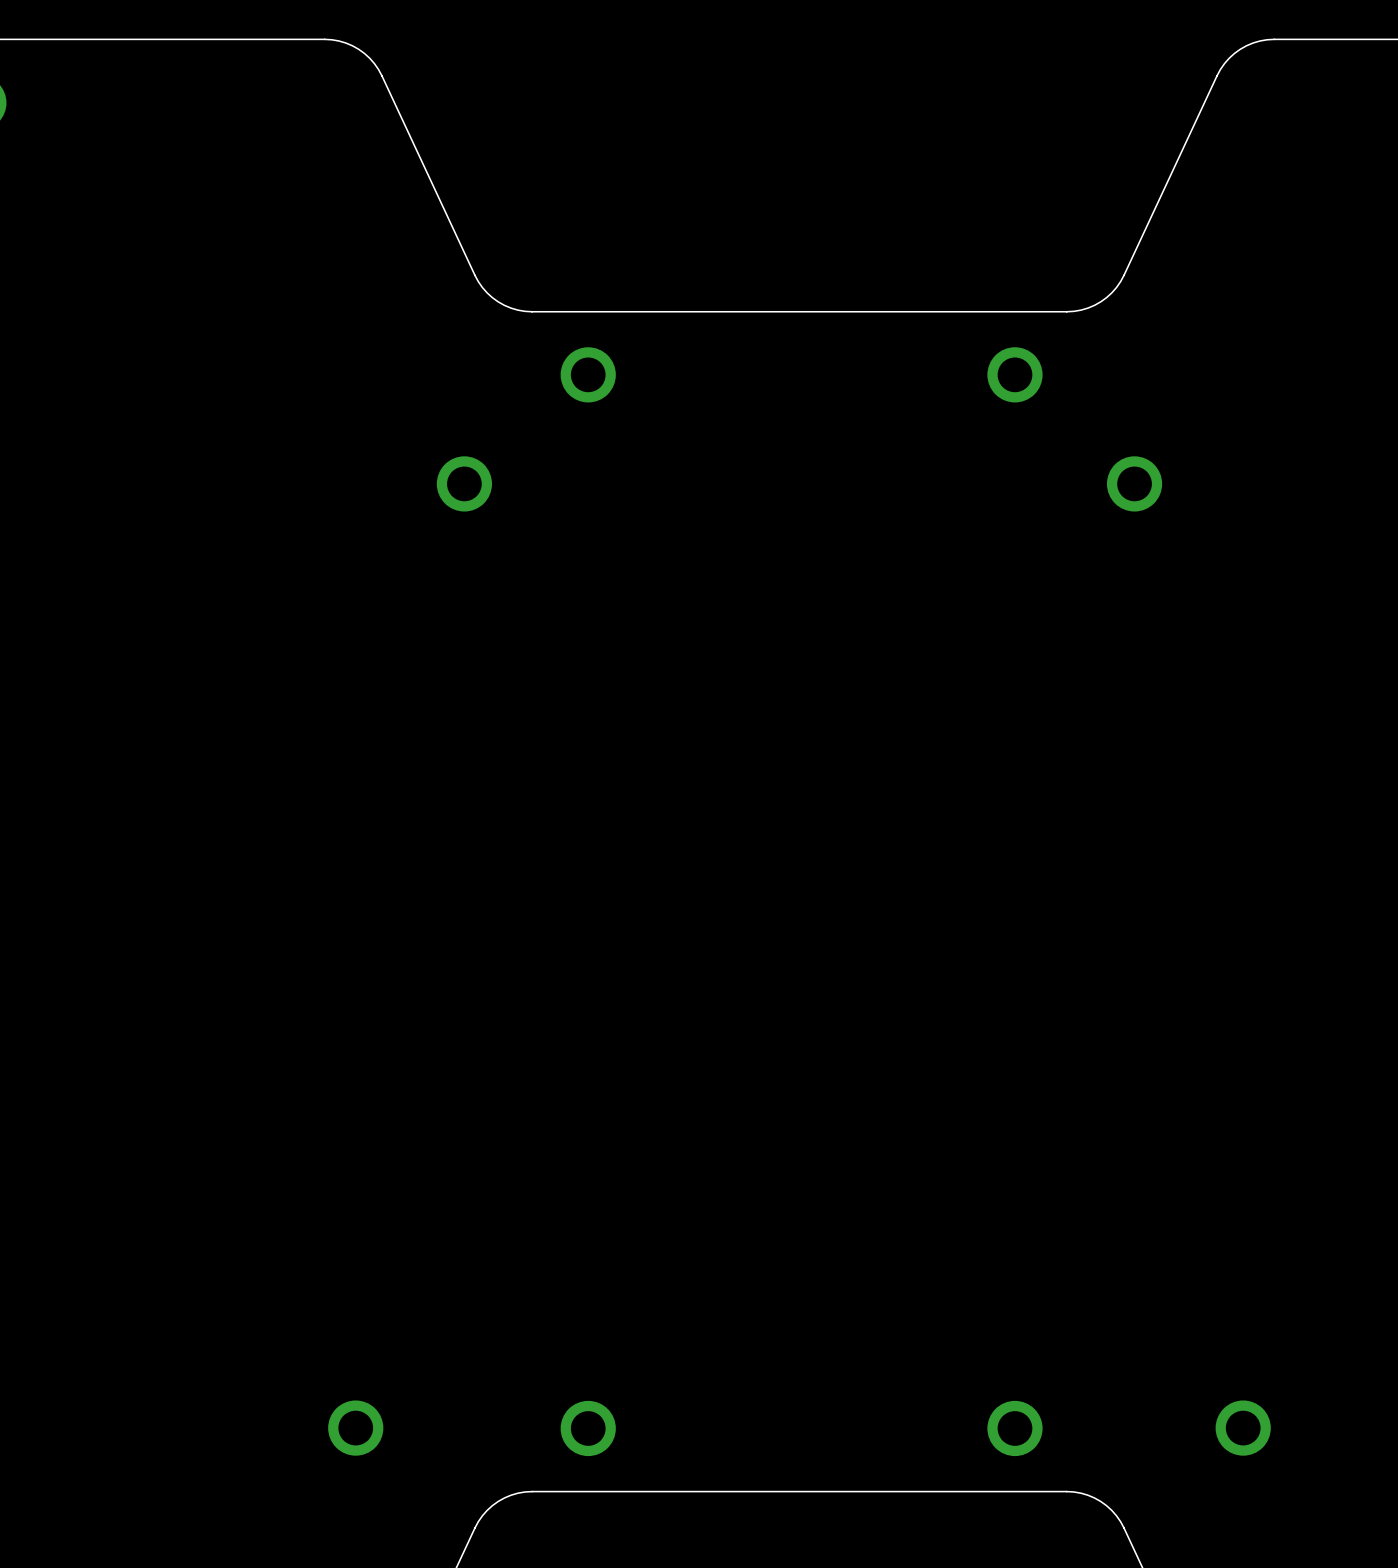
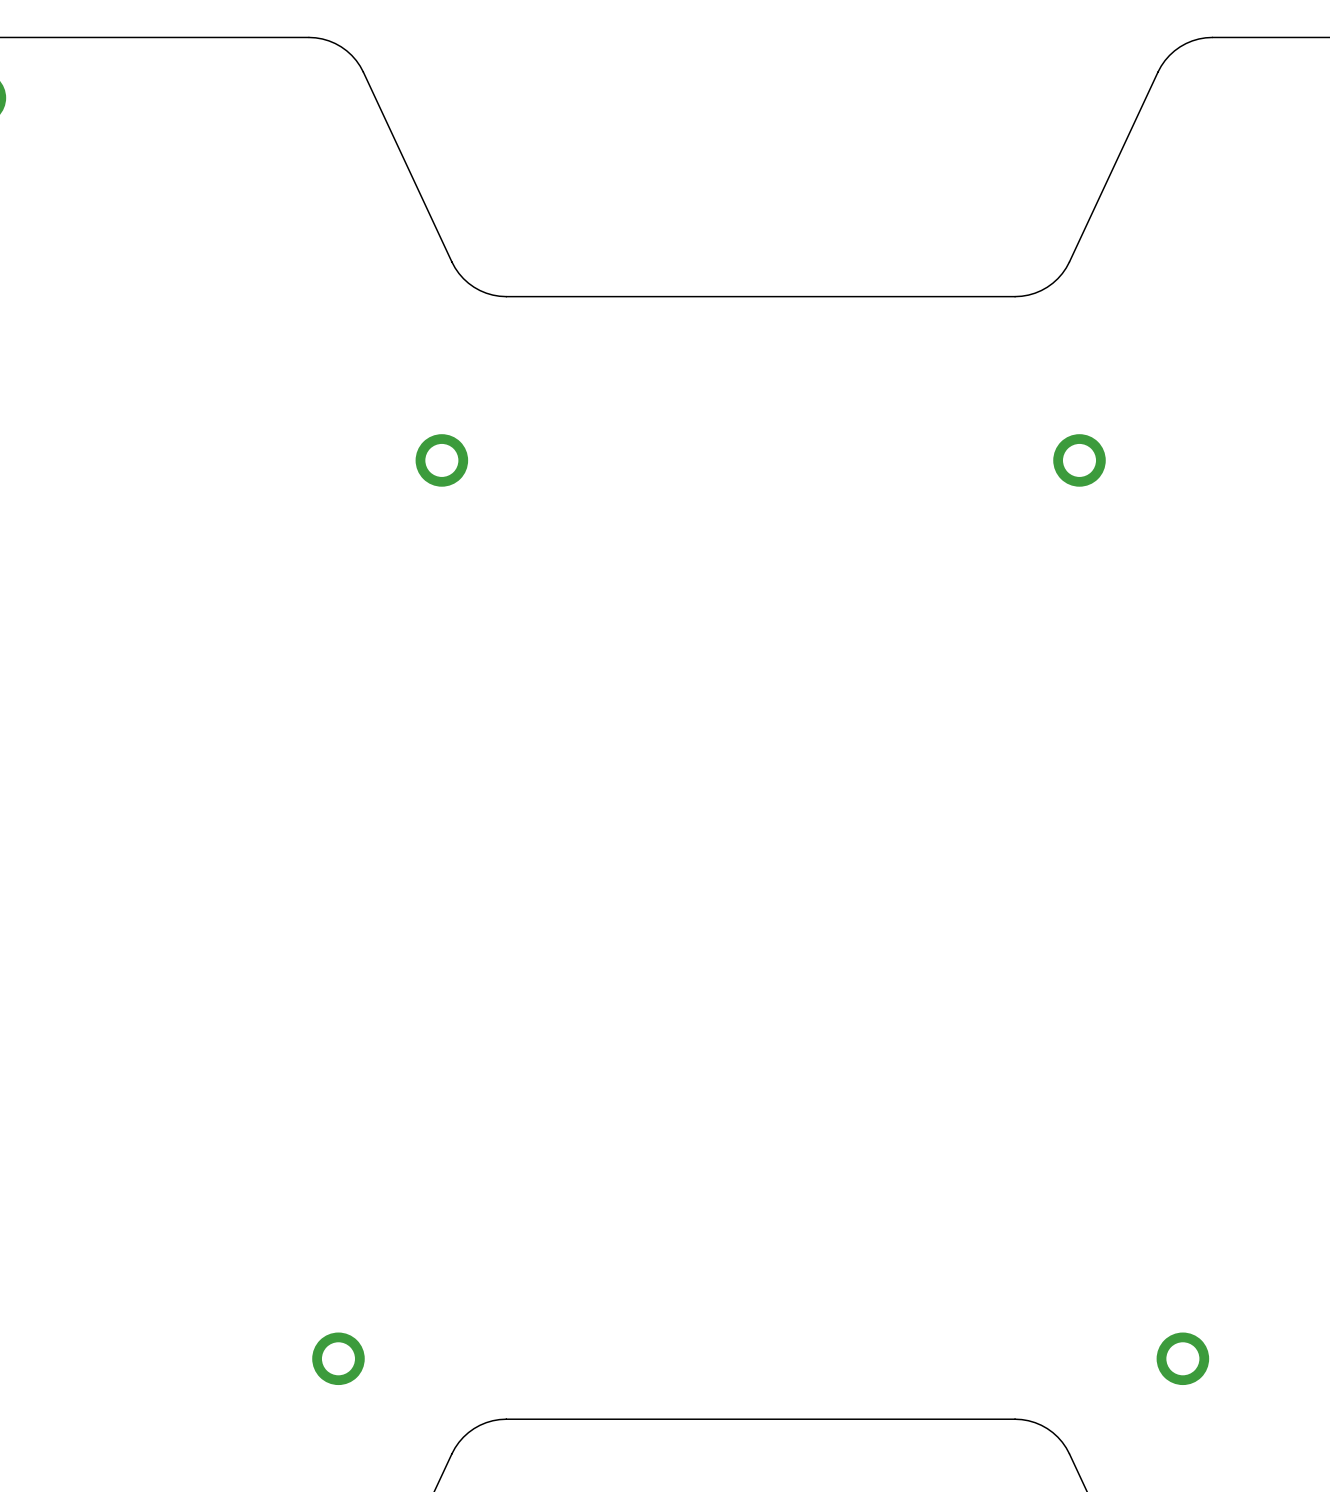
part: (588, 374) -> none
part: (1014, 374) -> none
part: (588, 1428) -> none
part: (1014, 1428) -> none

